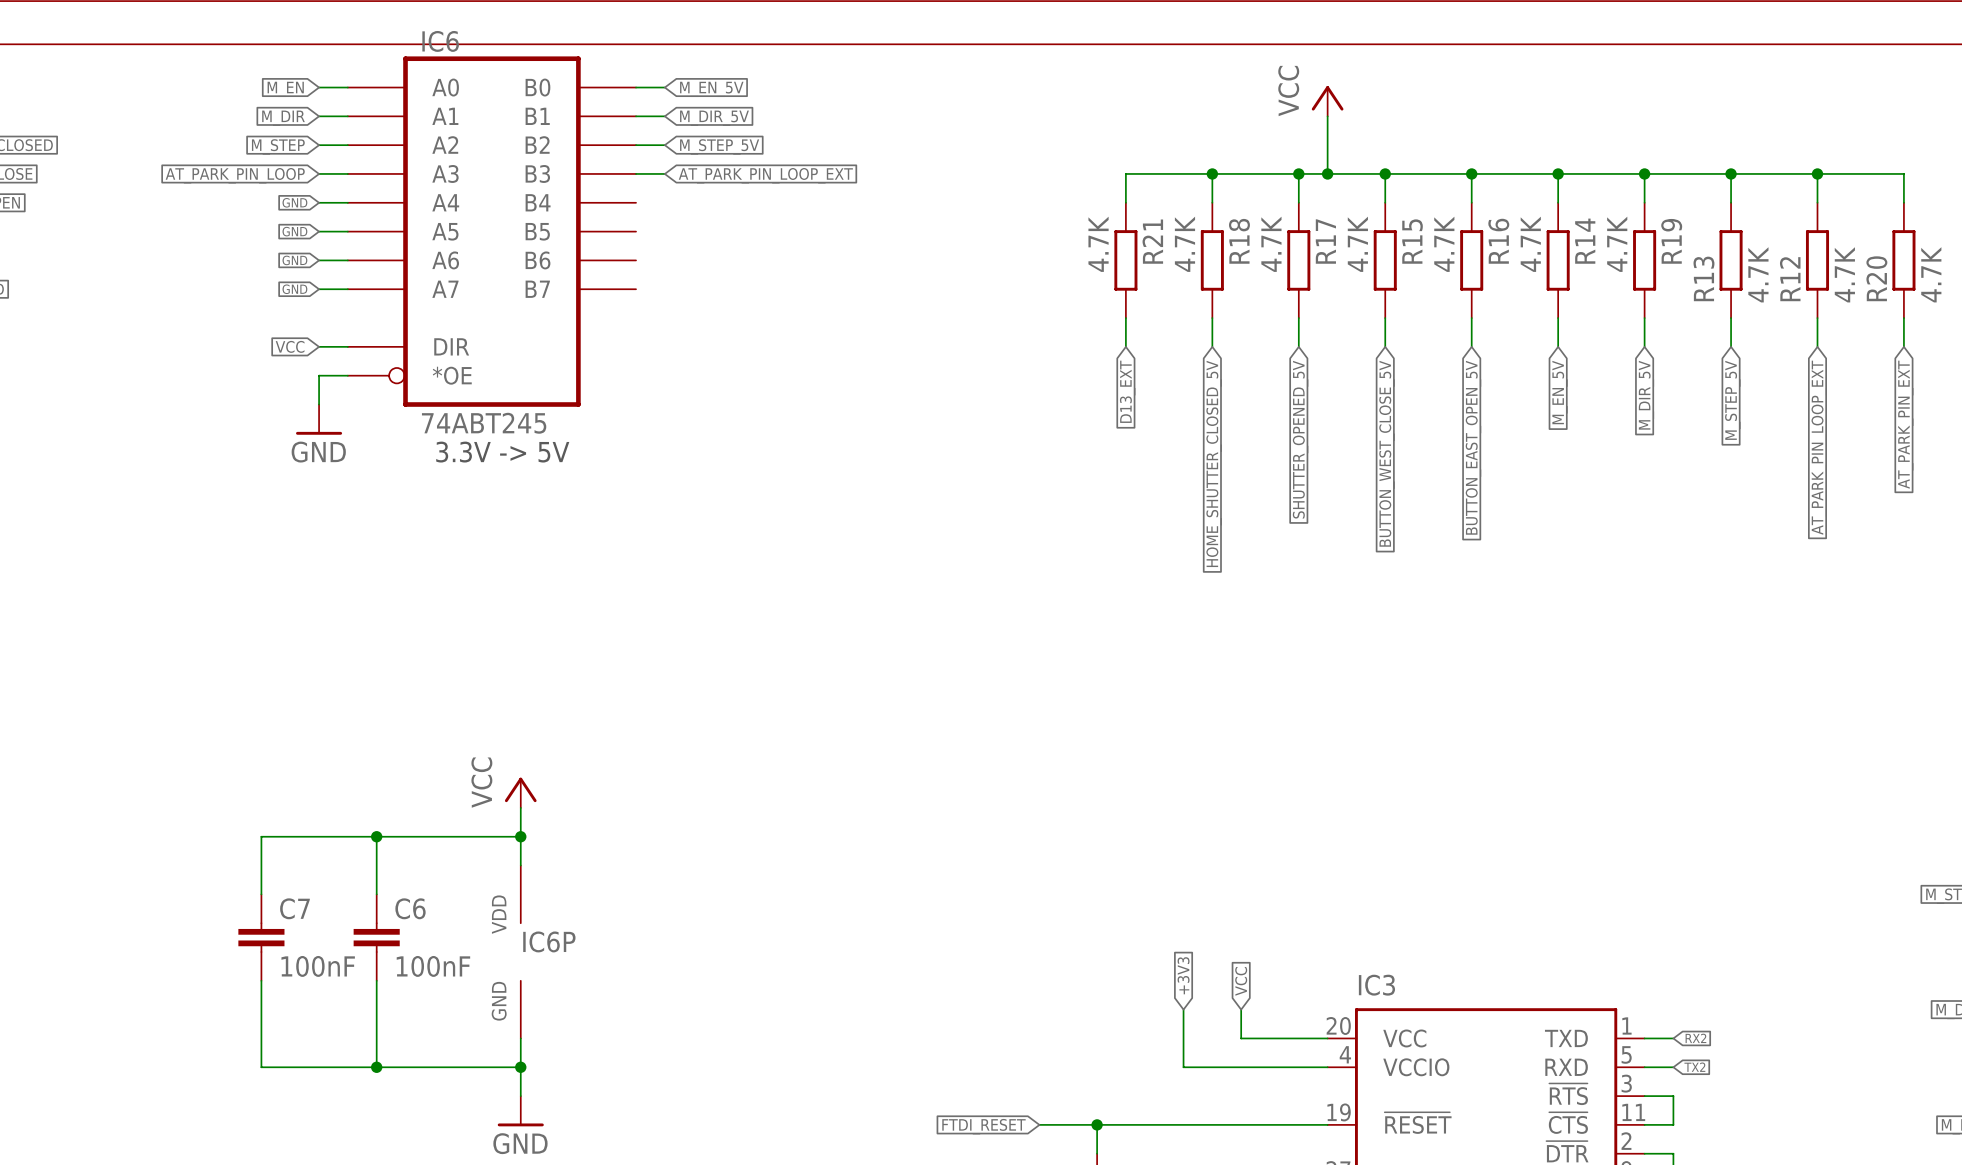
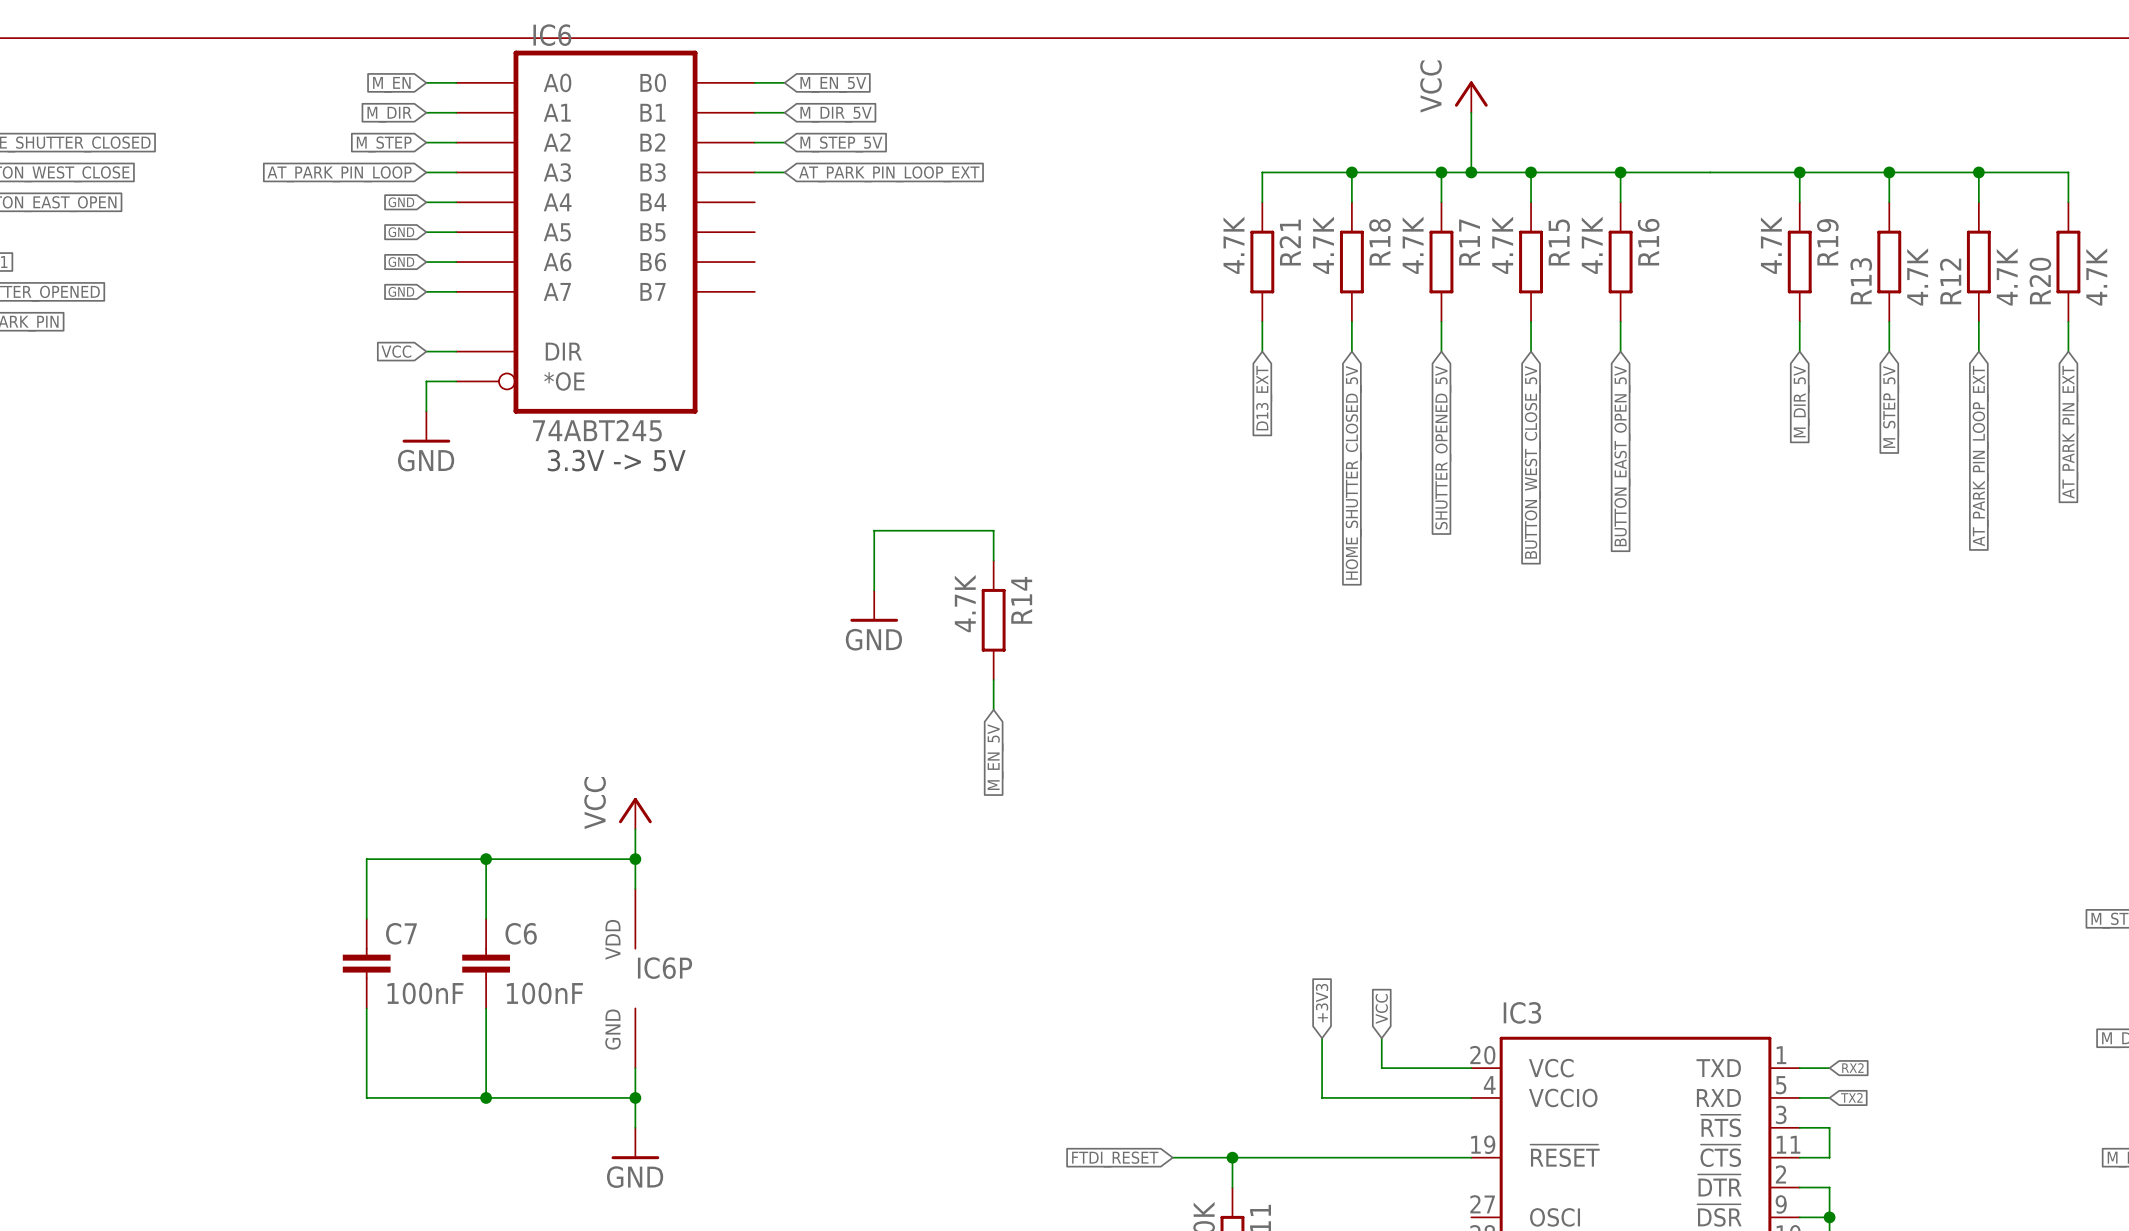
wire: (1558, 173) (1558, 202) -> none
junction: (1558, 173) -> none
R14 position: (1558, 260) -> (993, 620)
wire: (1558, 318) (1558, 346) -> none
global label: M_EN_5V (1560, 392) -> none
wire: none -> (993, 560) (993, 530) (874, 530) (874, 590)
power symbol: none -> GND (874, 606)
wire: none -> (993, 679) (993, 709)
global label: none -> M_EN_5V (995, 757)

